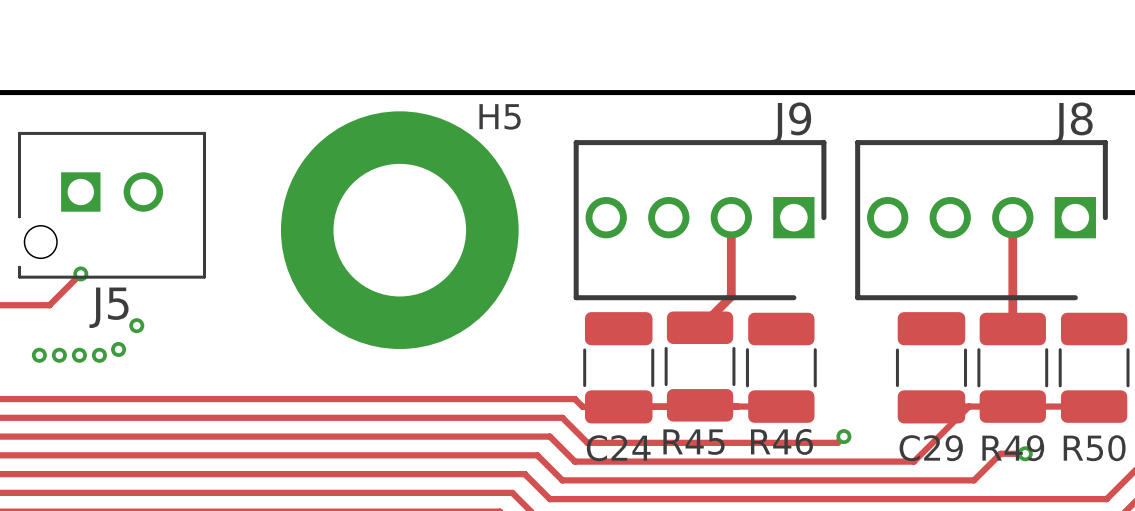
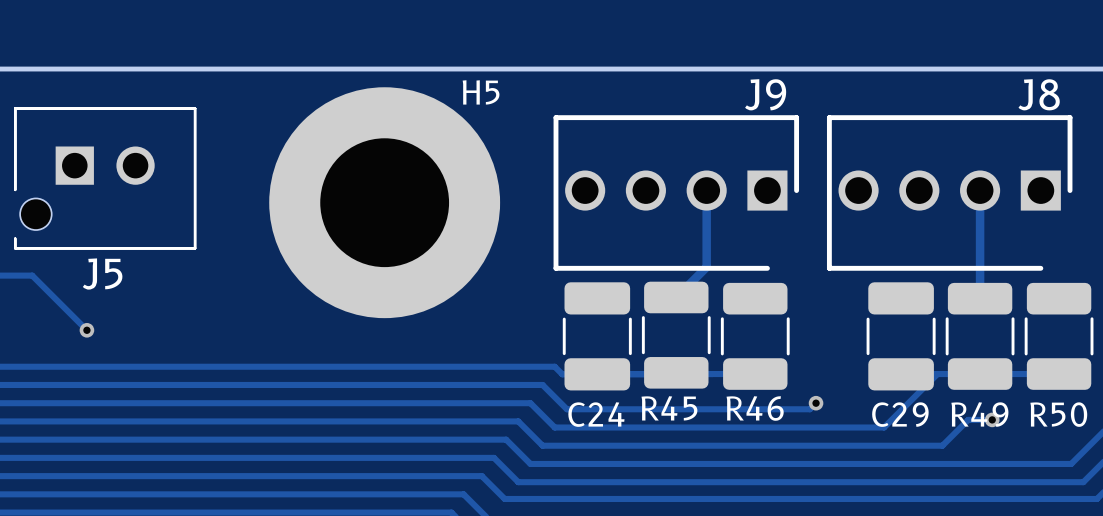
track: (80, 273) (49, 305) (37, 305) -> (86, 330) (32, 275)
via: (80, 273) -> none
via: (136, 325) -> none
via: (118, 349) -> none
via: (39, 355) -> none
via: (59, 355) -> none
via: (79, 355) -> none
via: (99, 355) -> none
via: none -> (86, 330)

